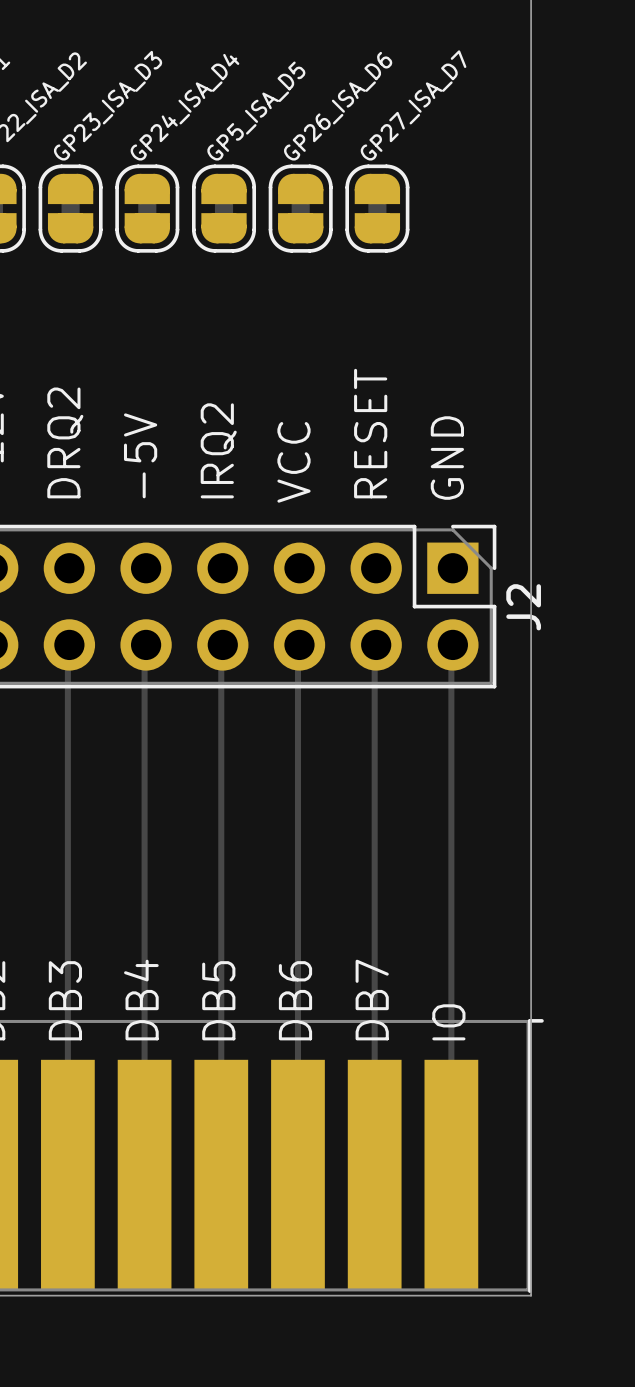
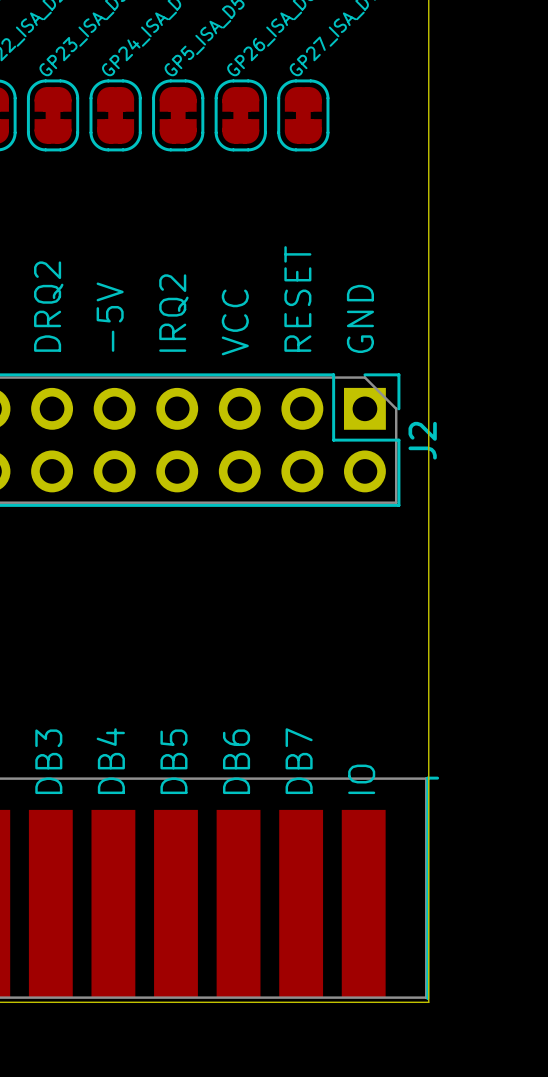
track: (69, 644) (67, 646) (67, 1174) -> none
track: (146, 644) (144, 646) (144, 1174) -> none
track: (222, 644) (221, 646) (221, 1174) -> none
track: (299, 644) (297, 646) (297, 1174) -> none
track: (376, 644) (374, 646) (374, 1174) -> none
track: (452, 644) (451, 646) (451, 1174) -> none

